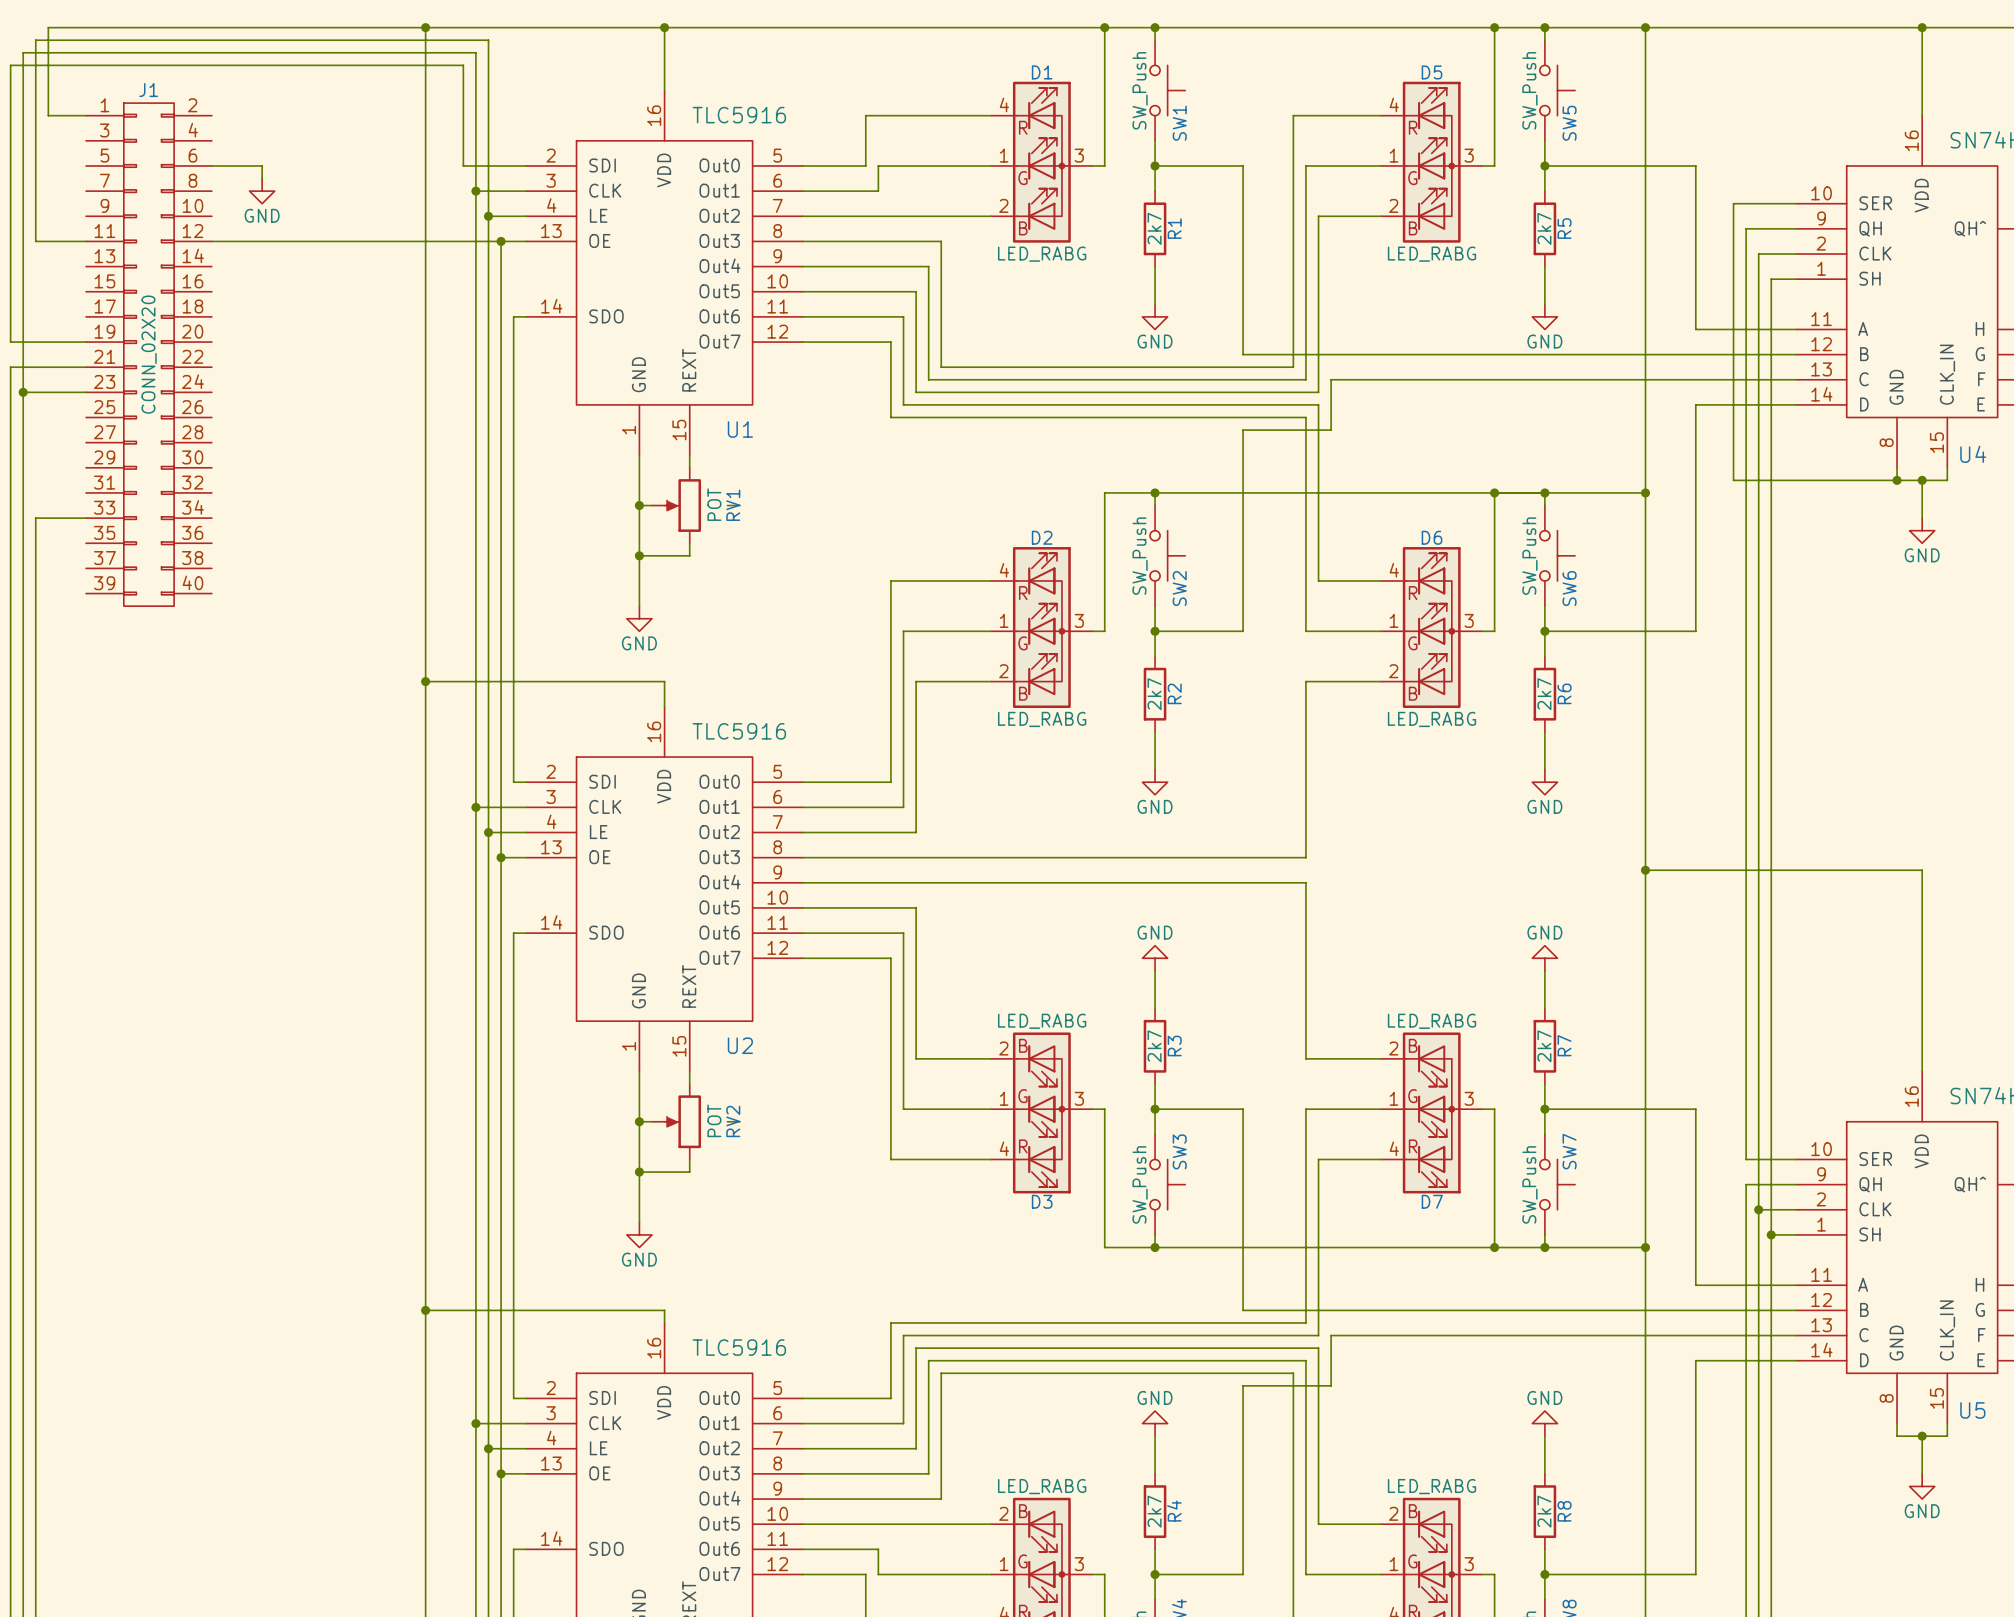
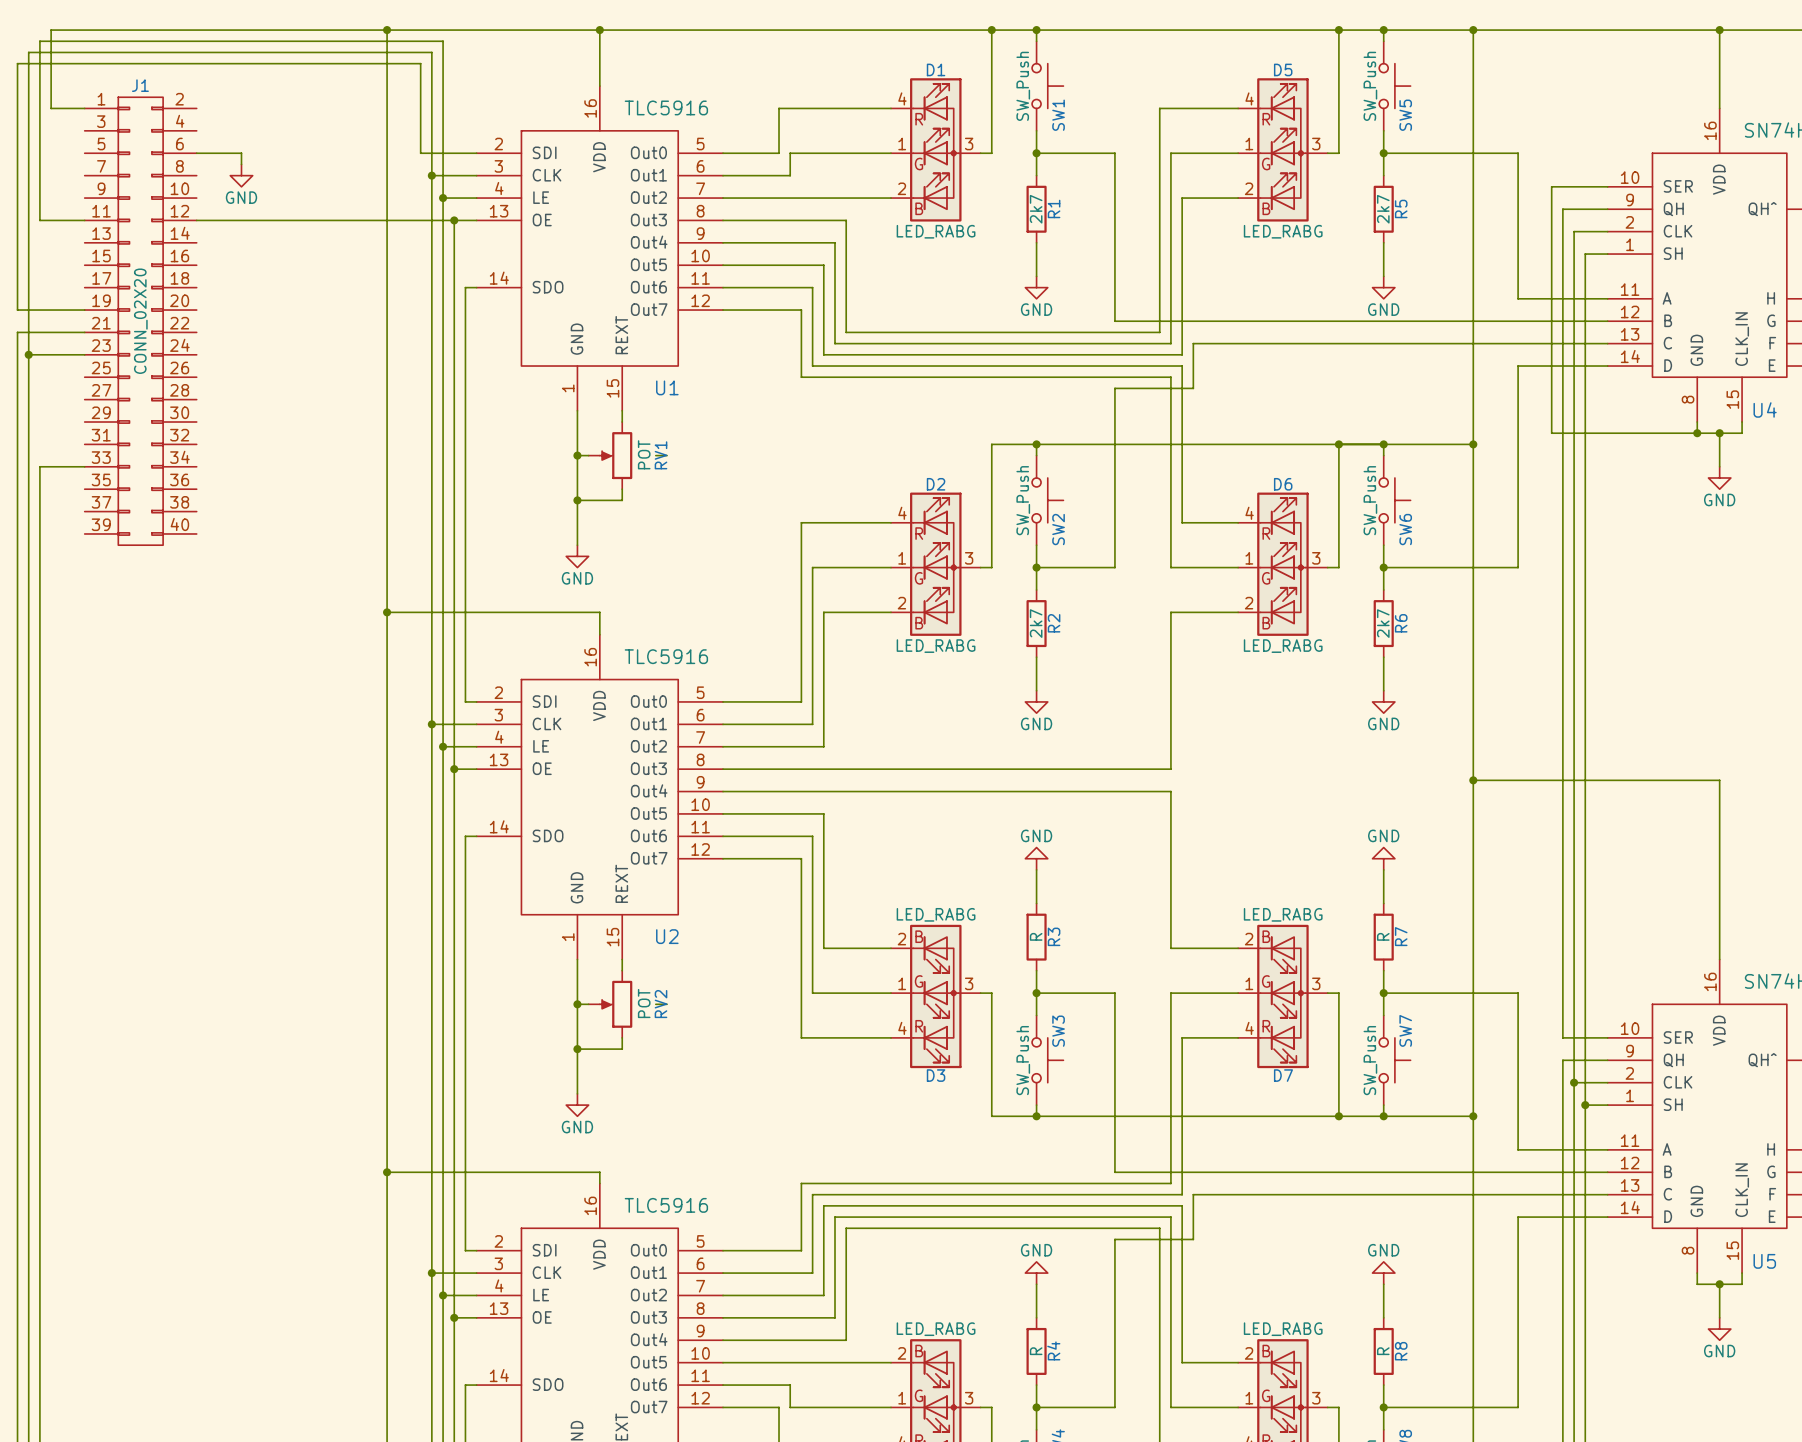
R3 value: 2k7 (1154, 1046) -> R (1036, 936)
R7 value: 2k7 (1544, 1046) -> R (1383, 936)
R4 value: 2k7 (1154, 1511) -> R (1036, 1351)
R8 value: 2k7 (1544, 1511) -> R (1383, 1351)

